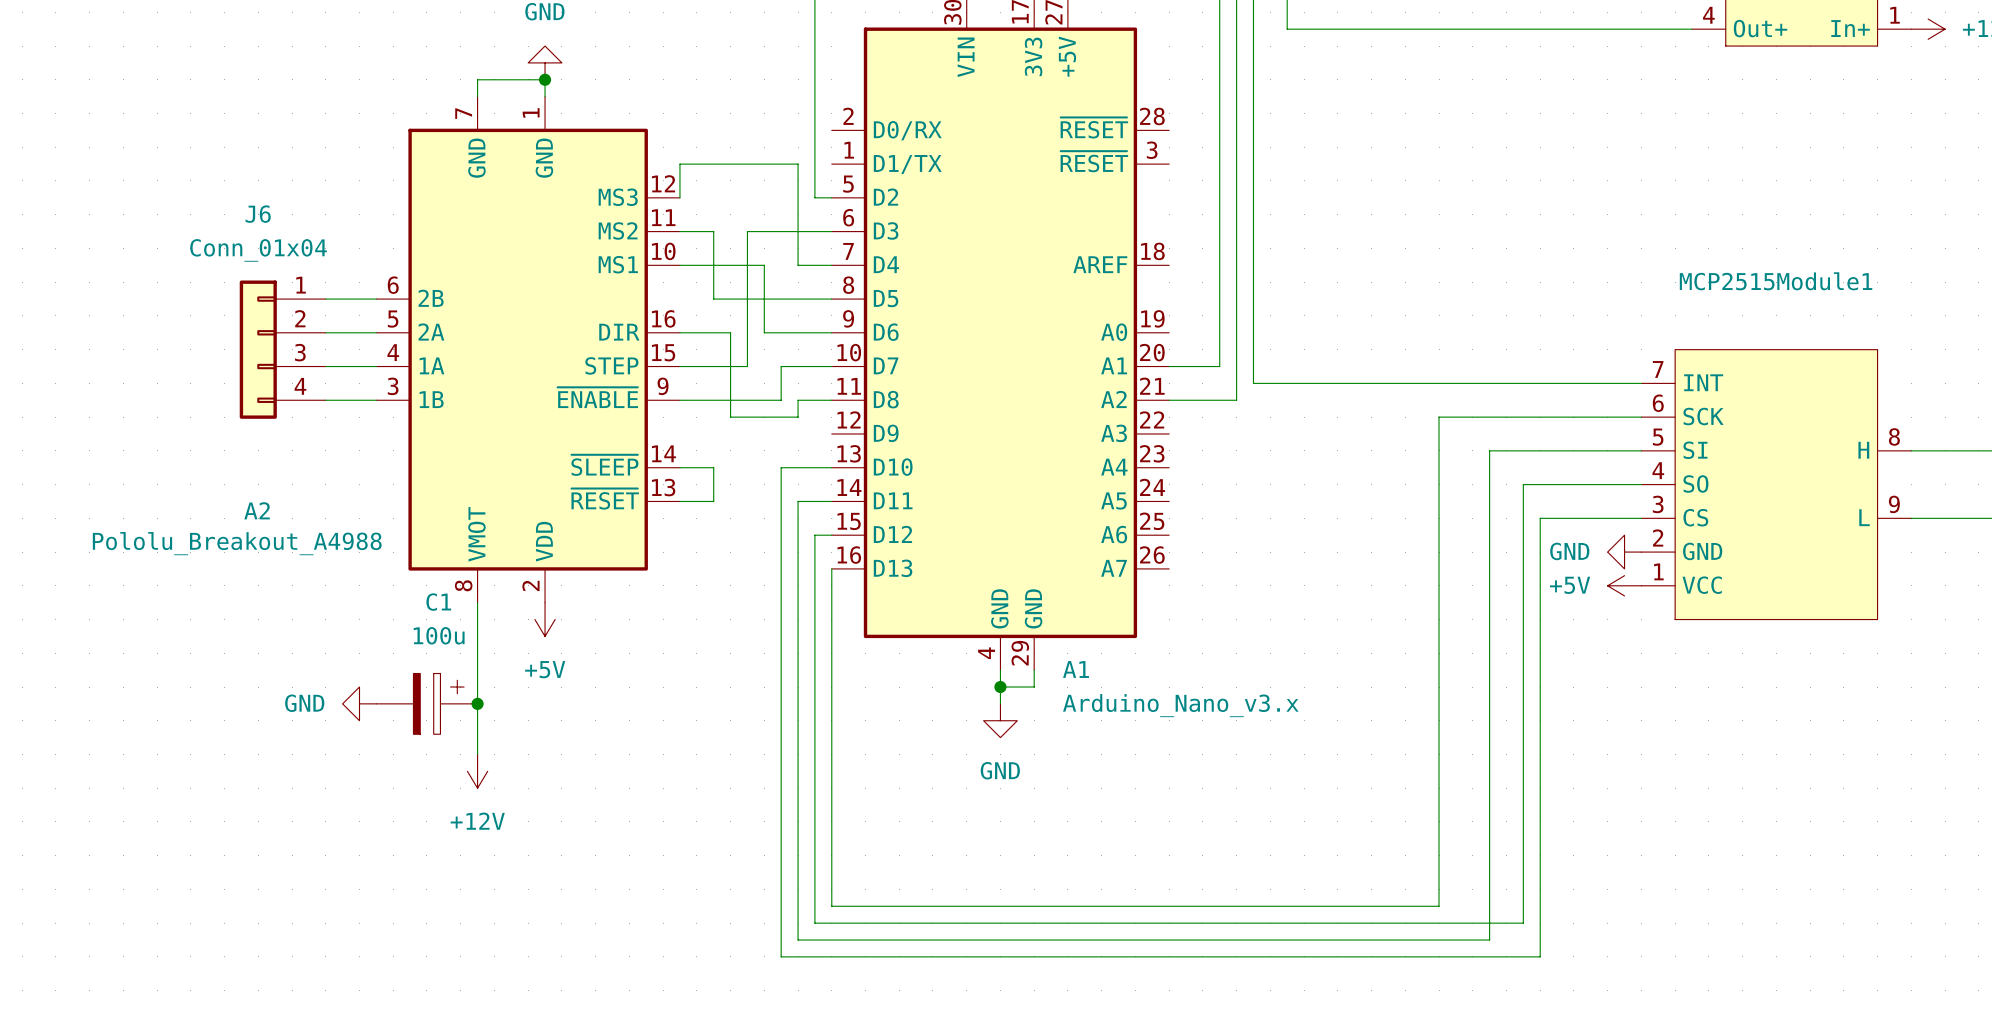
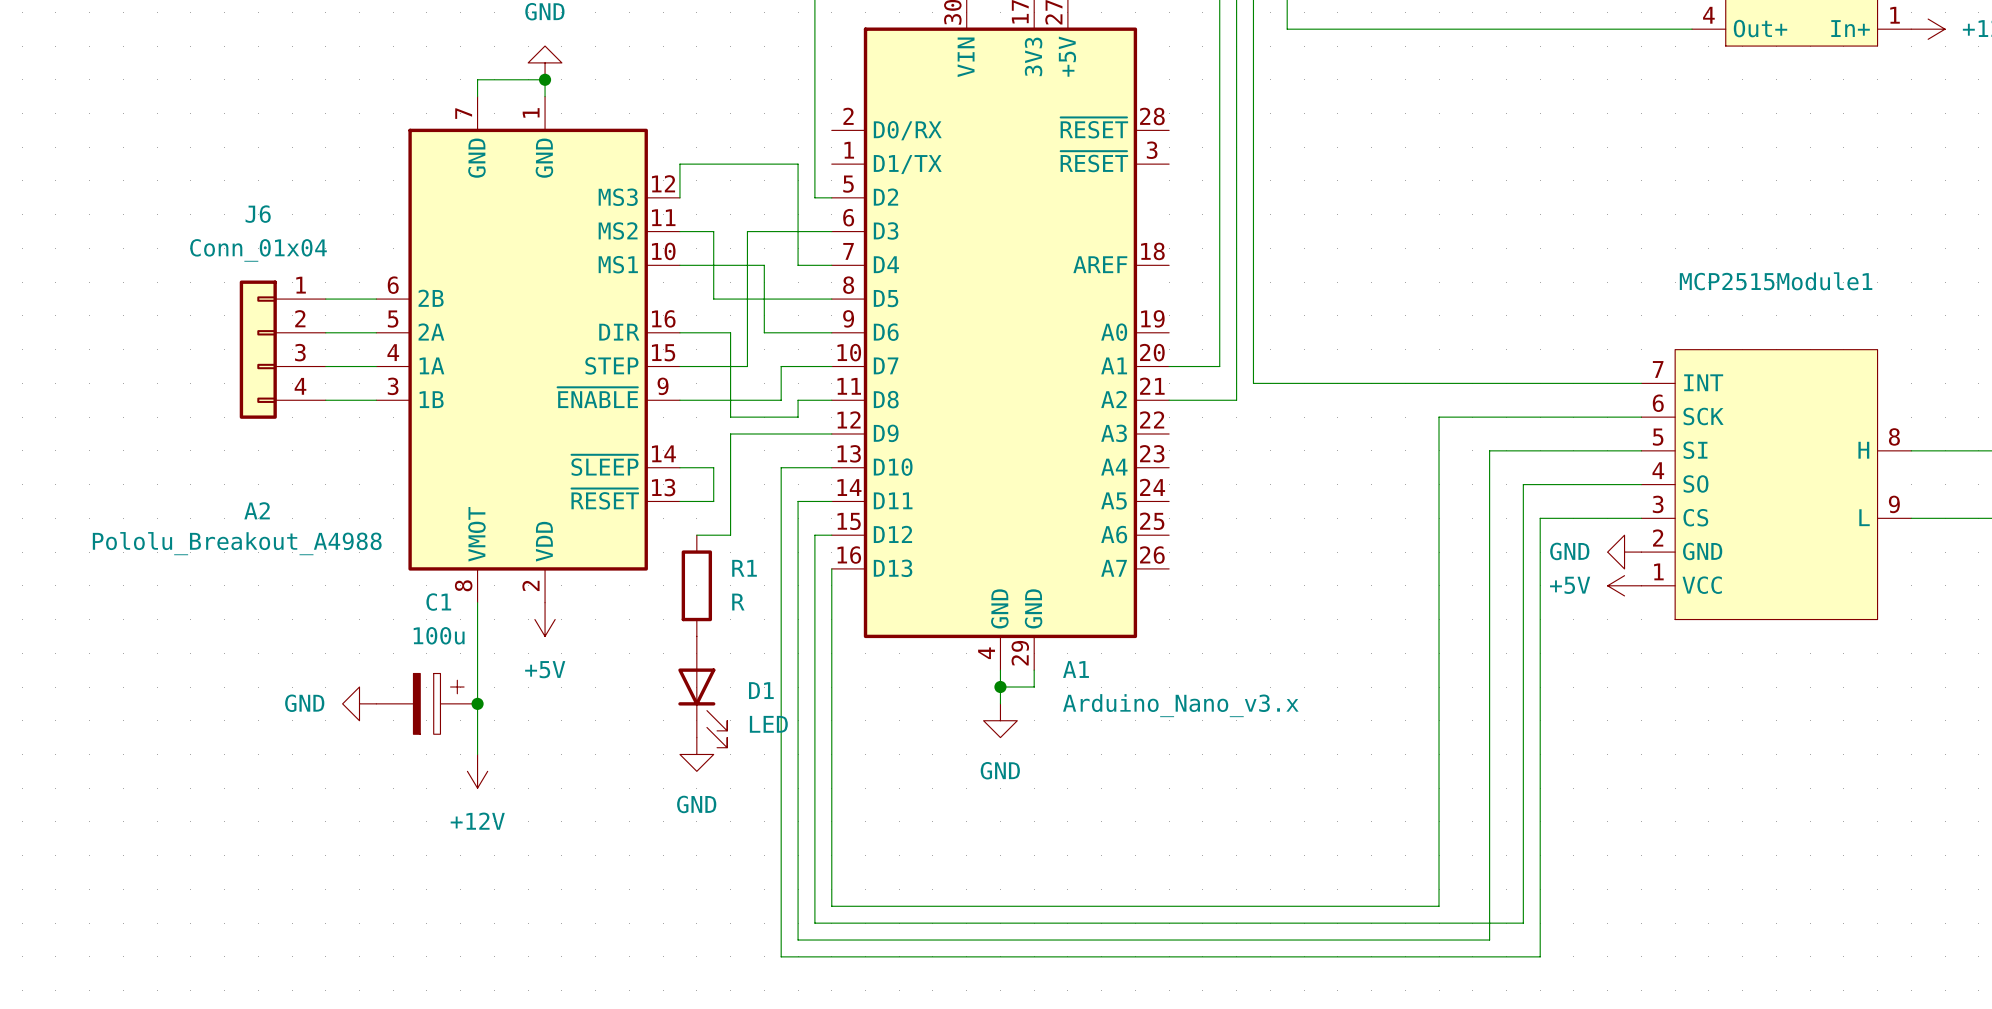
wire: none -> (831, 433) (730, 433) (730, 535) (696, 535)
R1: none -> R (696, 585)
D1: none -> LED (702, 692)
power symbol: none -> GND (696, 754)

